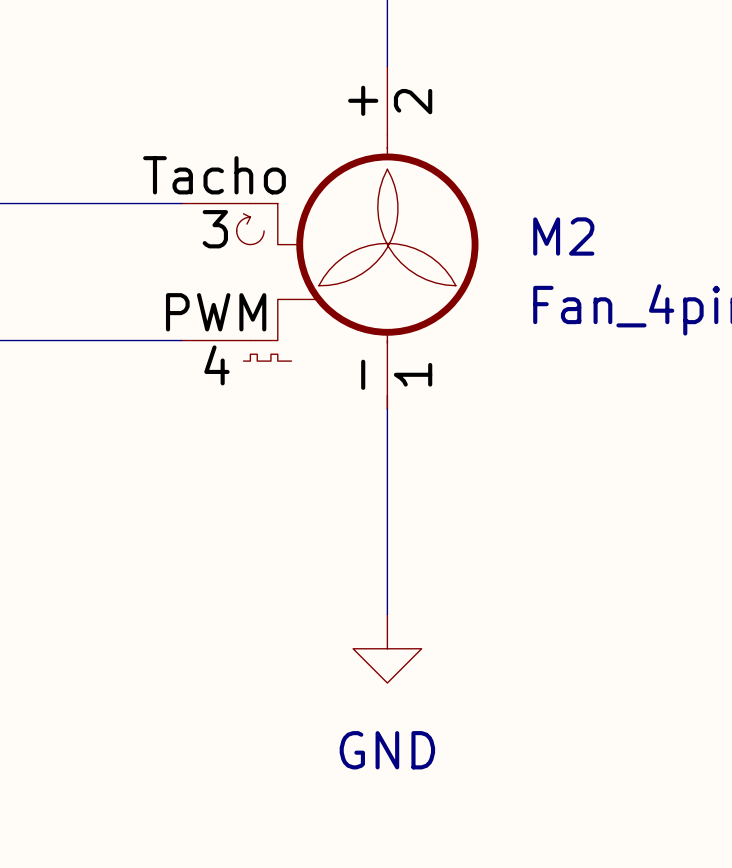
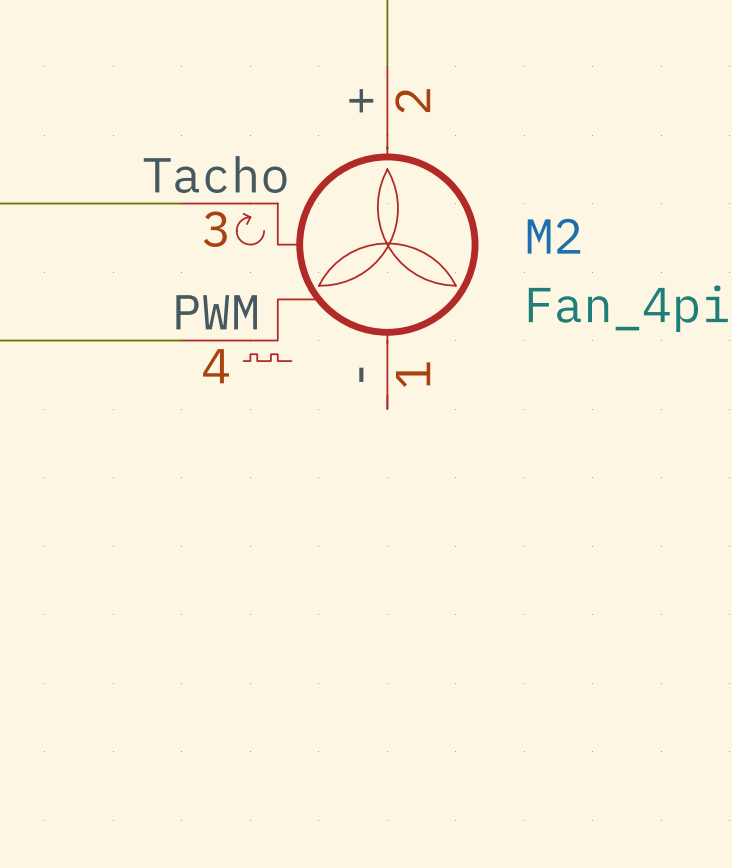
wire: (387, 409) (387, 614) -> none
power symbol: GND (387, 648) -> none

